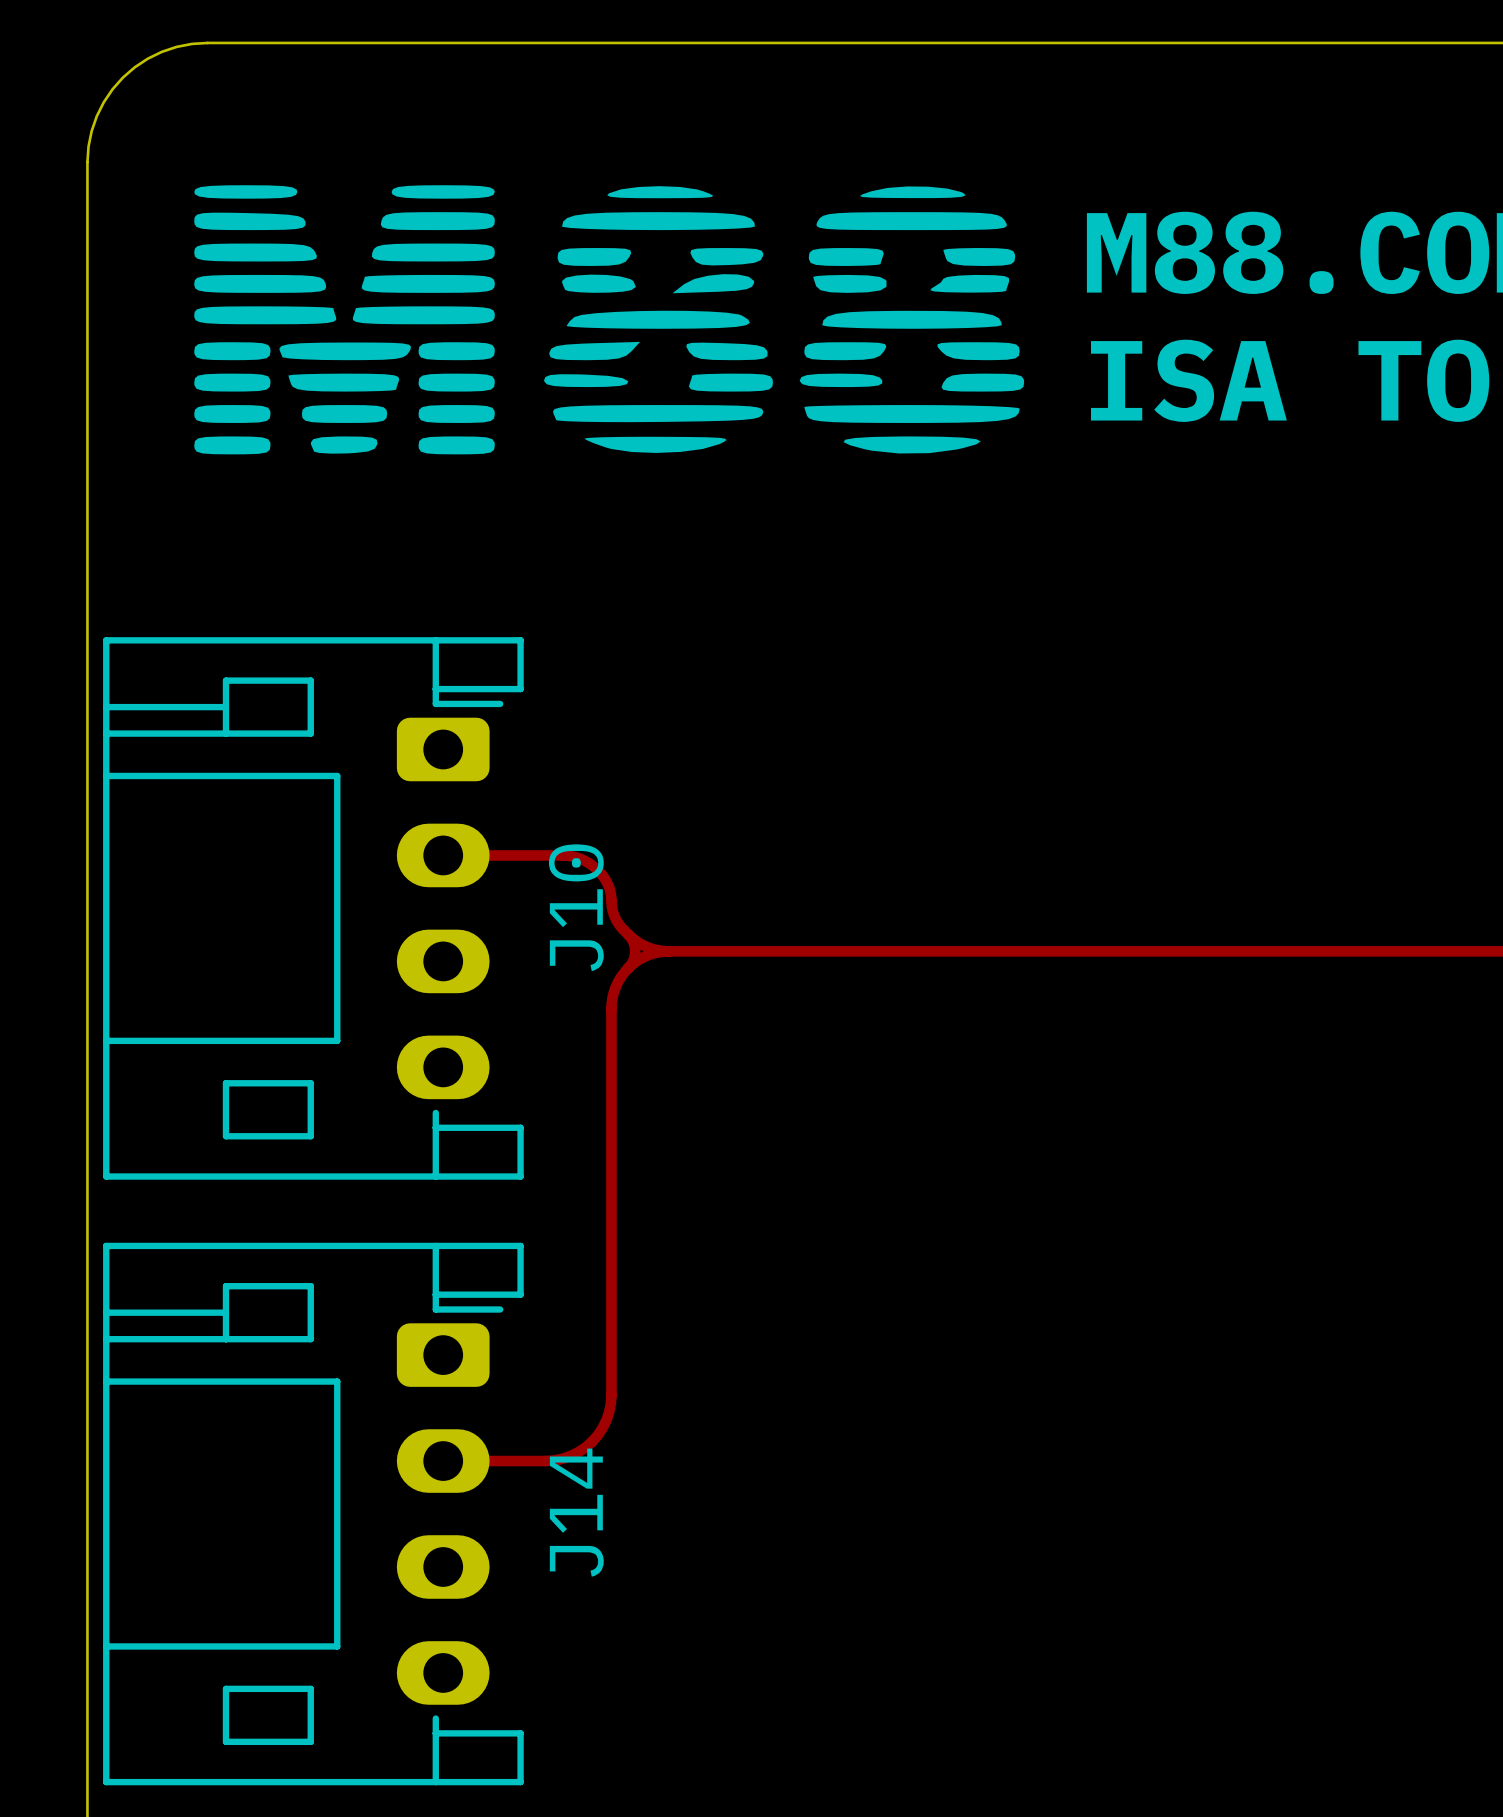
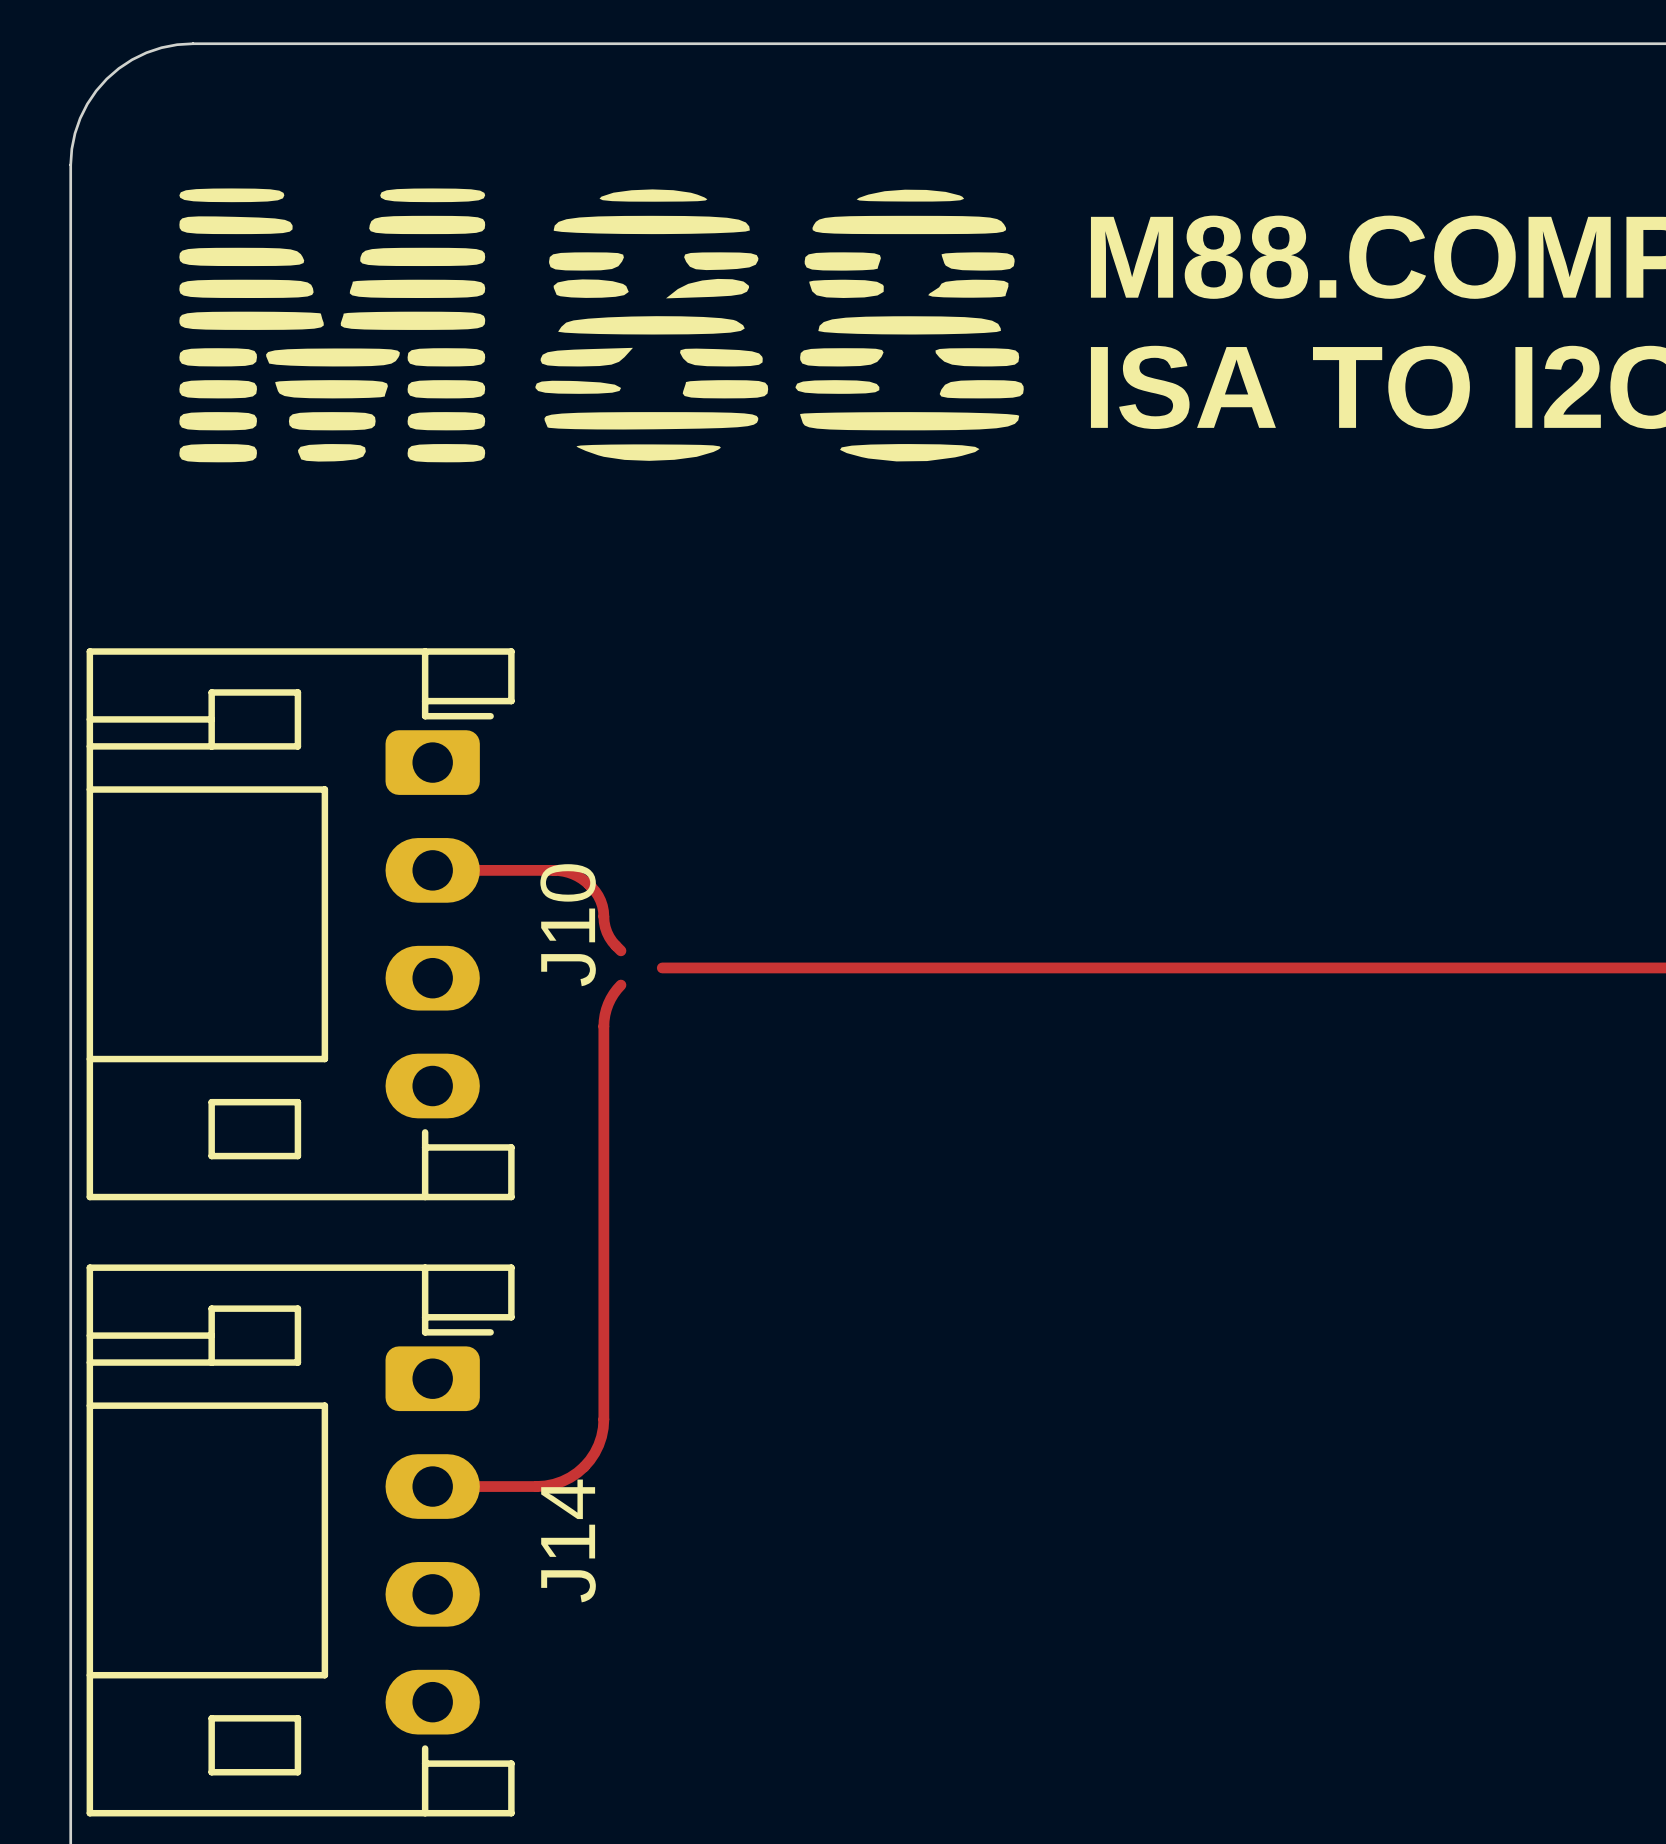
track: (628, 934) (646, 946) (668, 951) (646, 955) (628, 968) (633, 960) (635, 951) (633, 942) (628, 934) -> none

